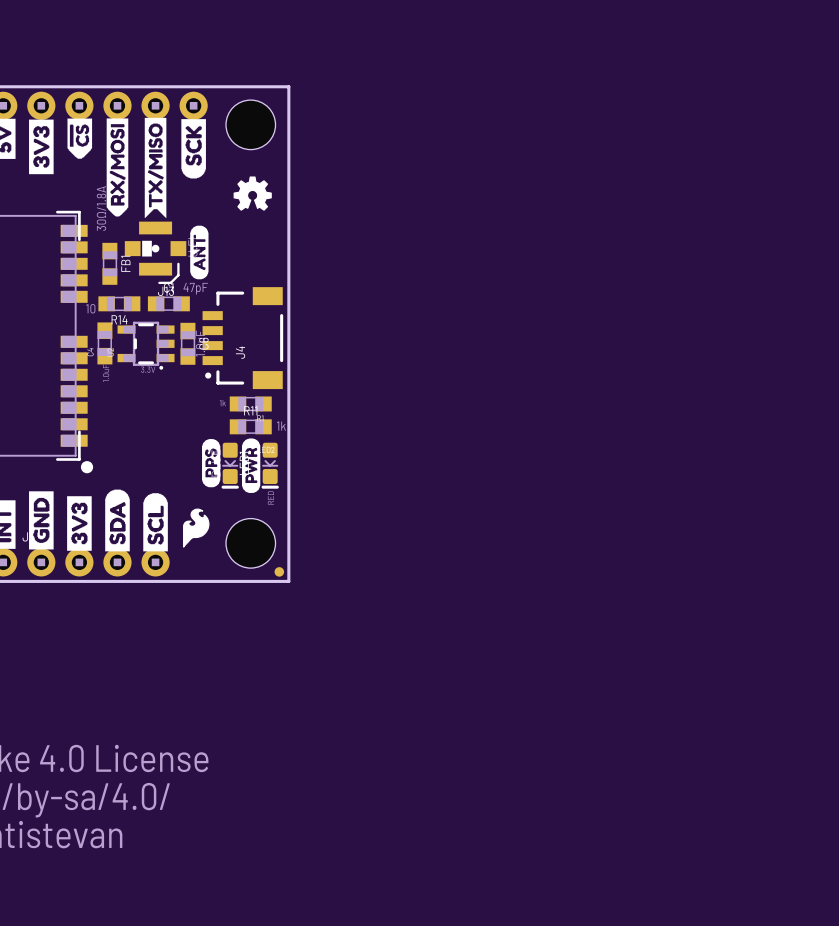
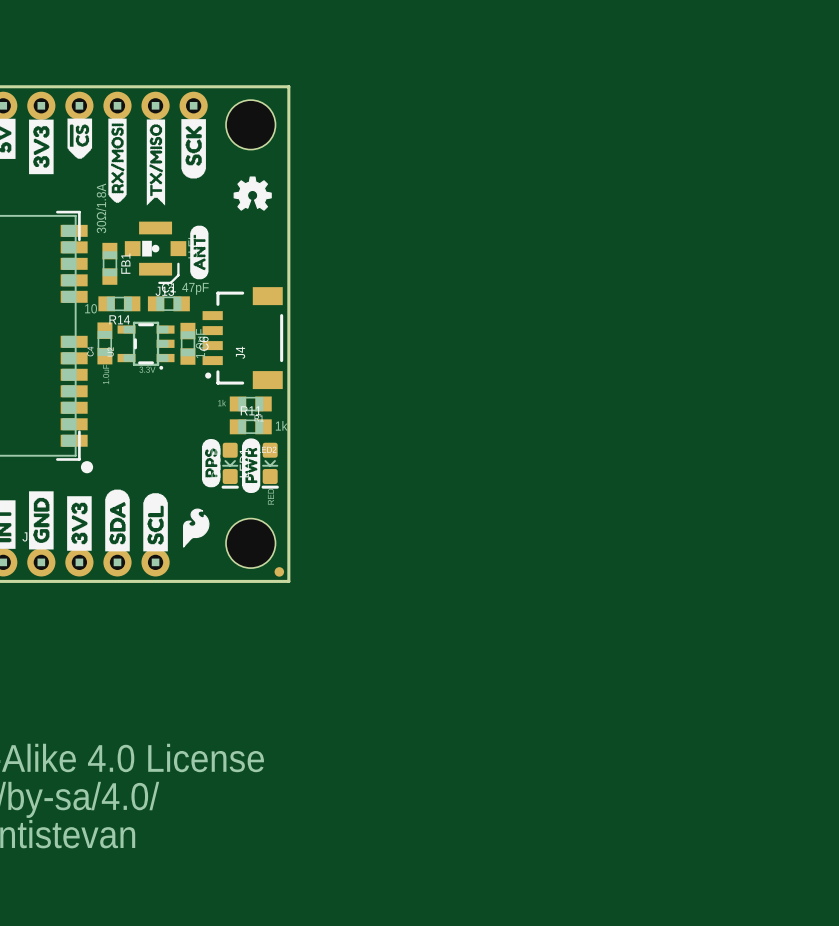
drawing shape: [144, 117, 167, 219] -> [146, 119, 166, 206]
drawing shape: [106, 118, 129, 217] -> [108, 118, 127, 203]

